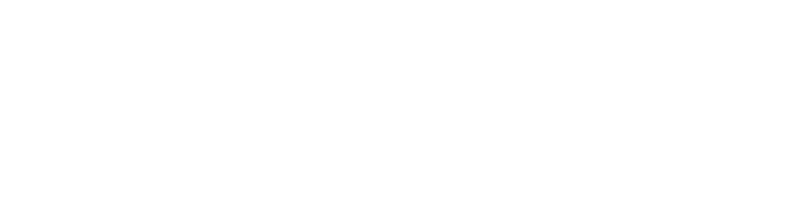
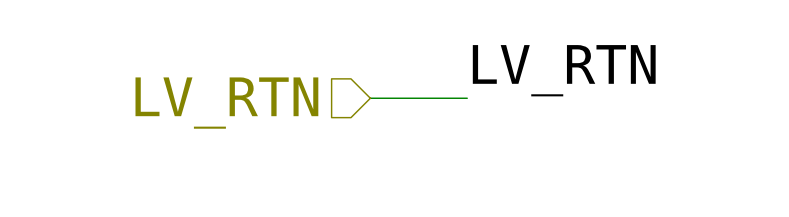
label: none -> LV_RTN (564, 70)
wire: none -> (370, 98) (467, 98)
hierarchical label: none -> LV_RTN (226, 103)

